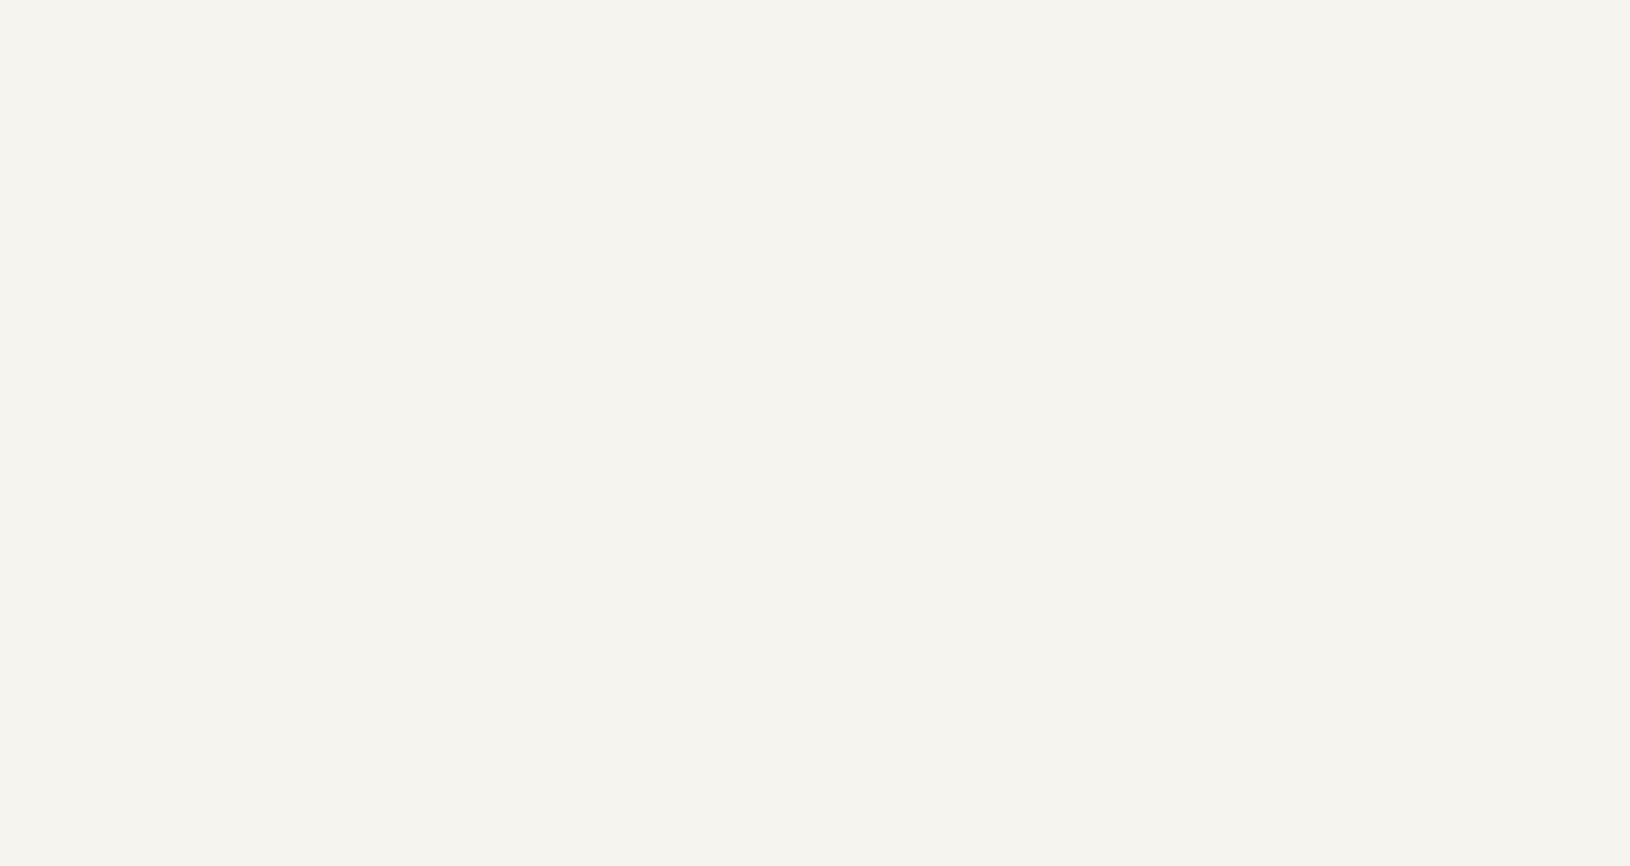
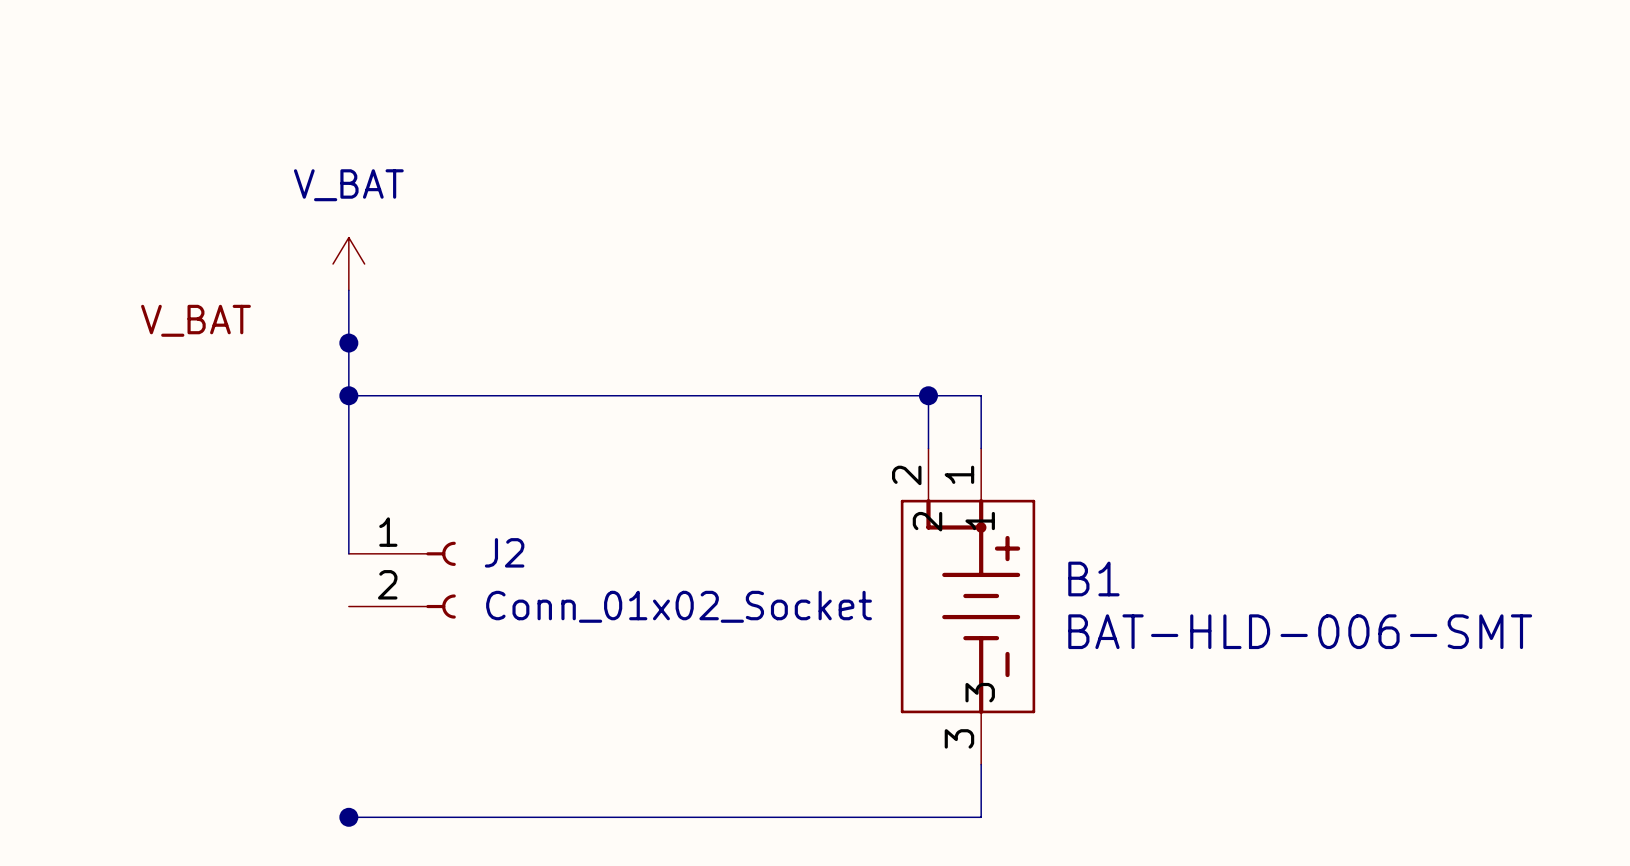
power symbol: none -> V_BAT (348, 264)
wire: none -> (348, 290) (348, 553)
label: none -> V_BAT (195, 320)
junction: none -> (348, 343)
wire: none -> (348, 395) (981, 395) (981, 448)
junction: none -> (348, 395)
wire: none -> (928, 395) (928, 448)
junction: none -> (928, 395)
J2: none -> Conn_01x02_Socket (402, 580)
B1: none -> BAT-HLD-006-SMT (968, 606)
wire: none -> (981, 764) (981, 817) (348, 817)
junction: none -> (348, 817)

